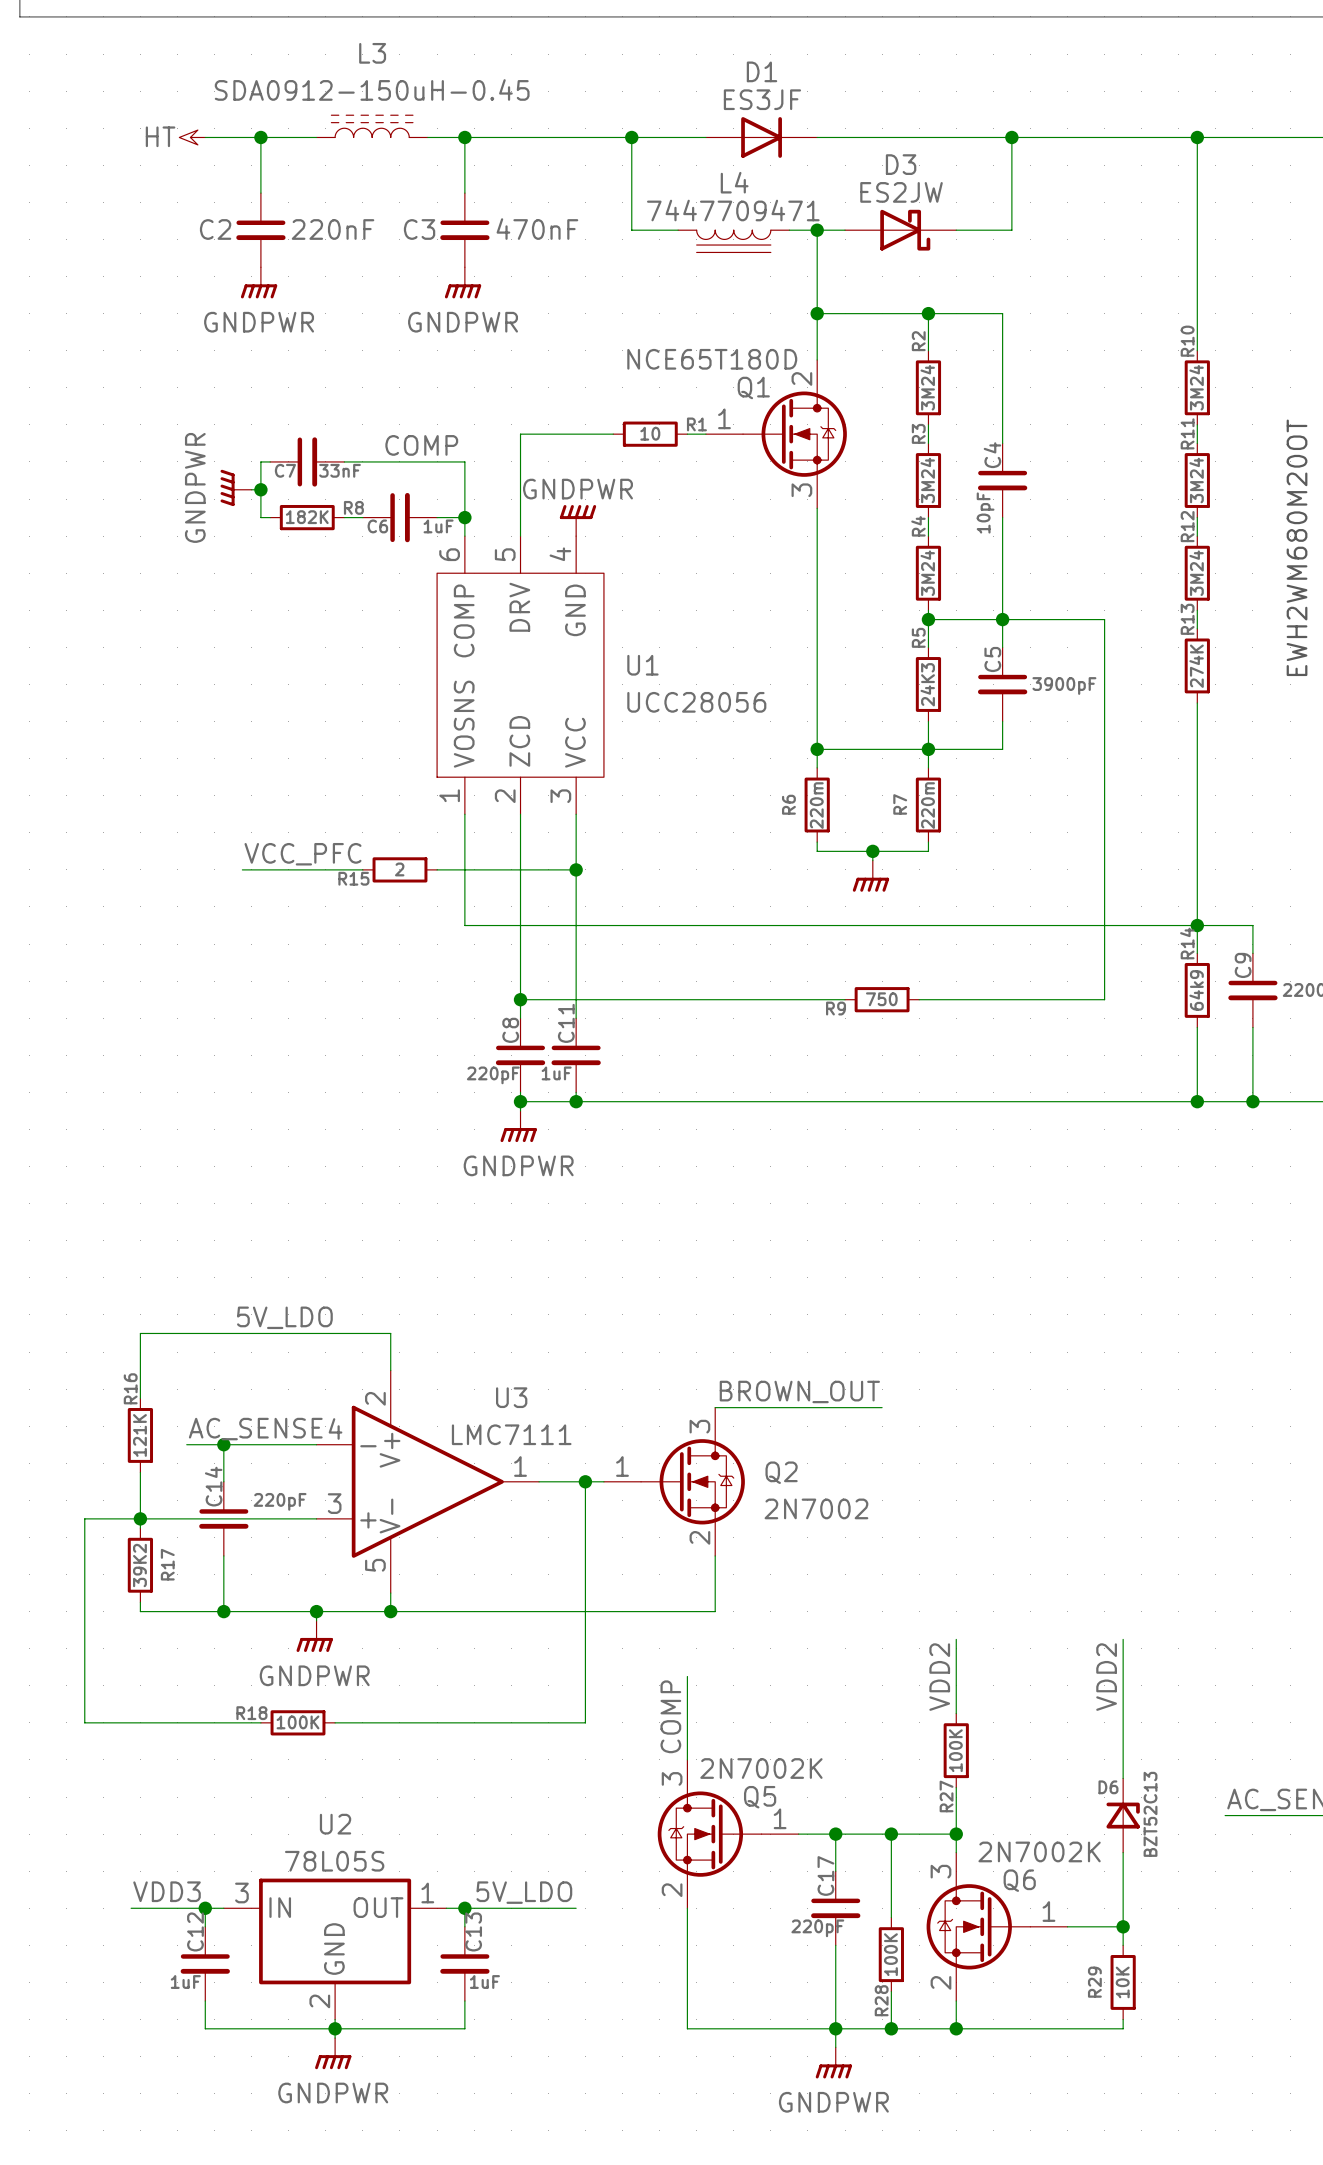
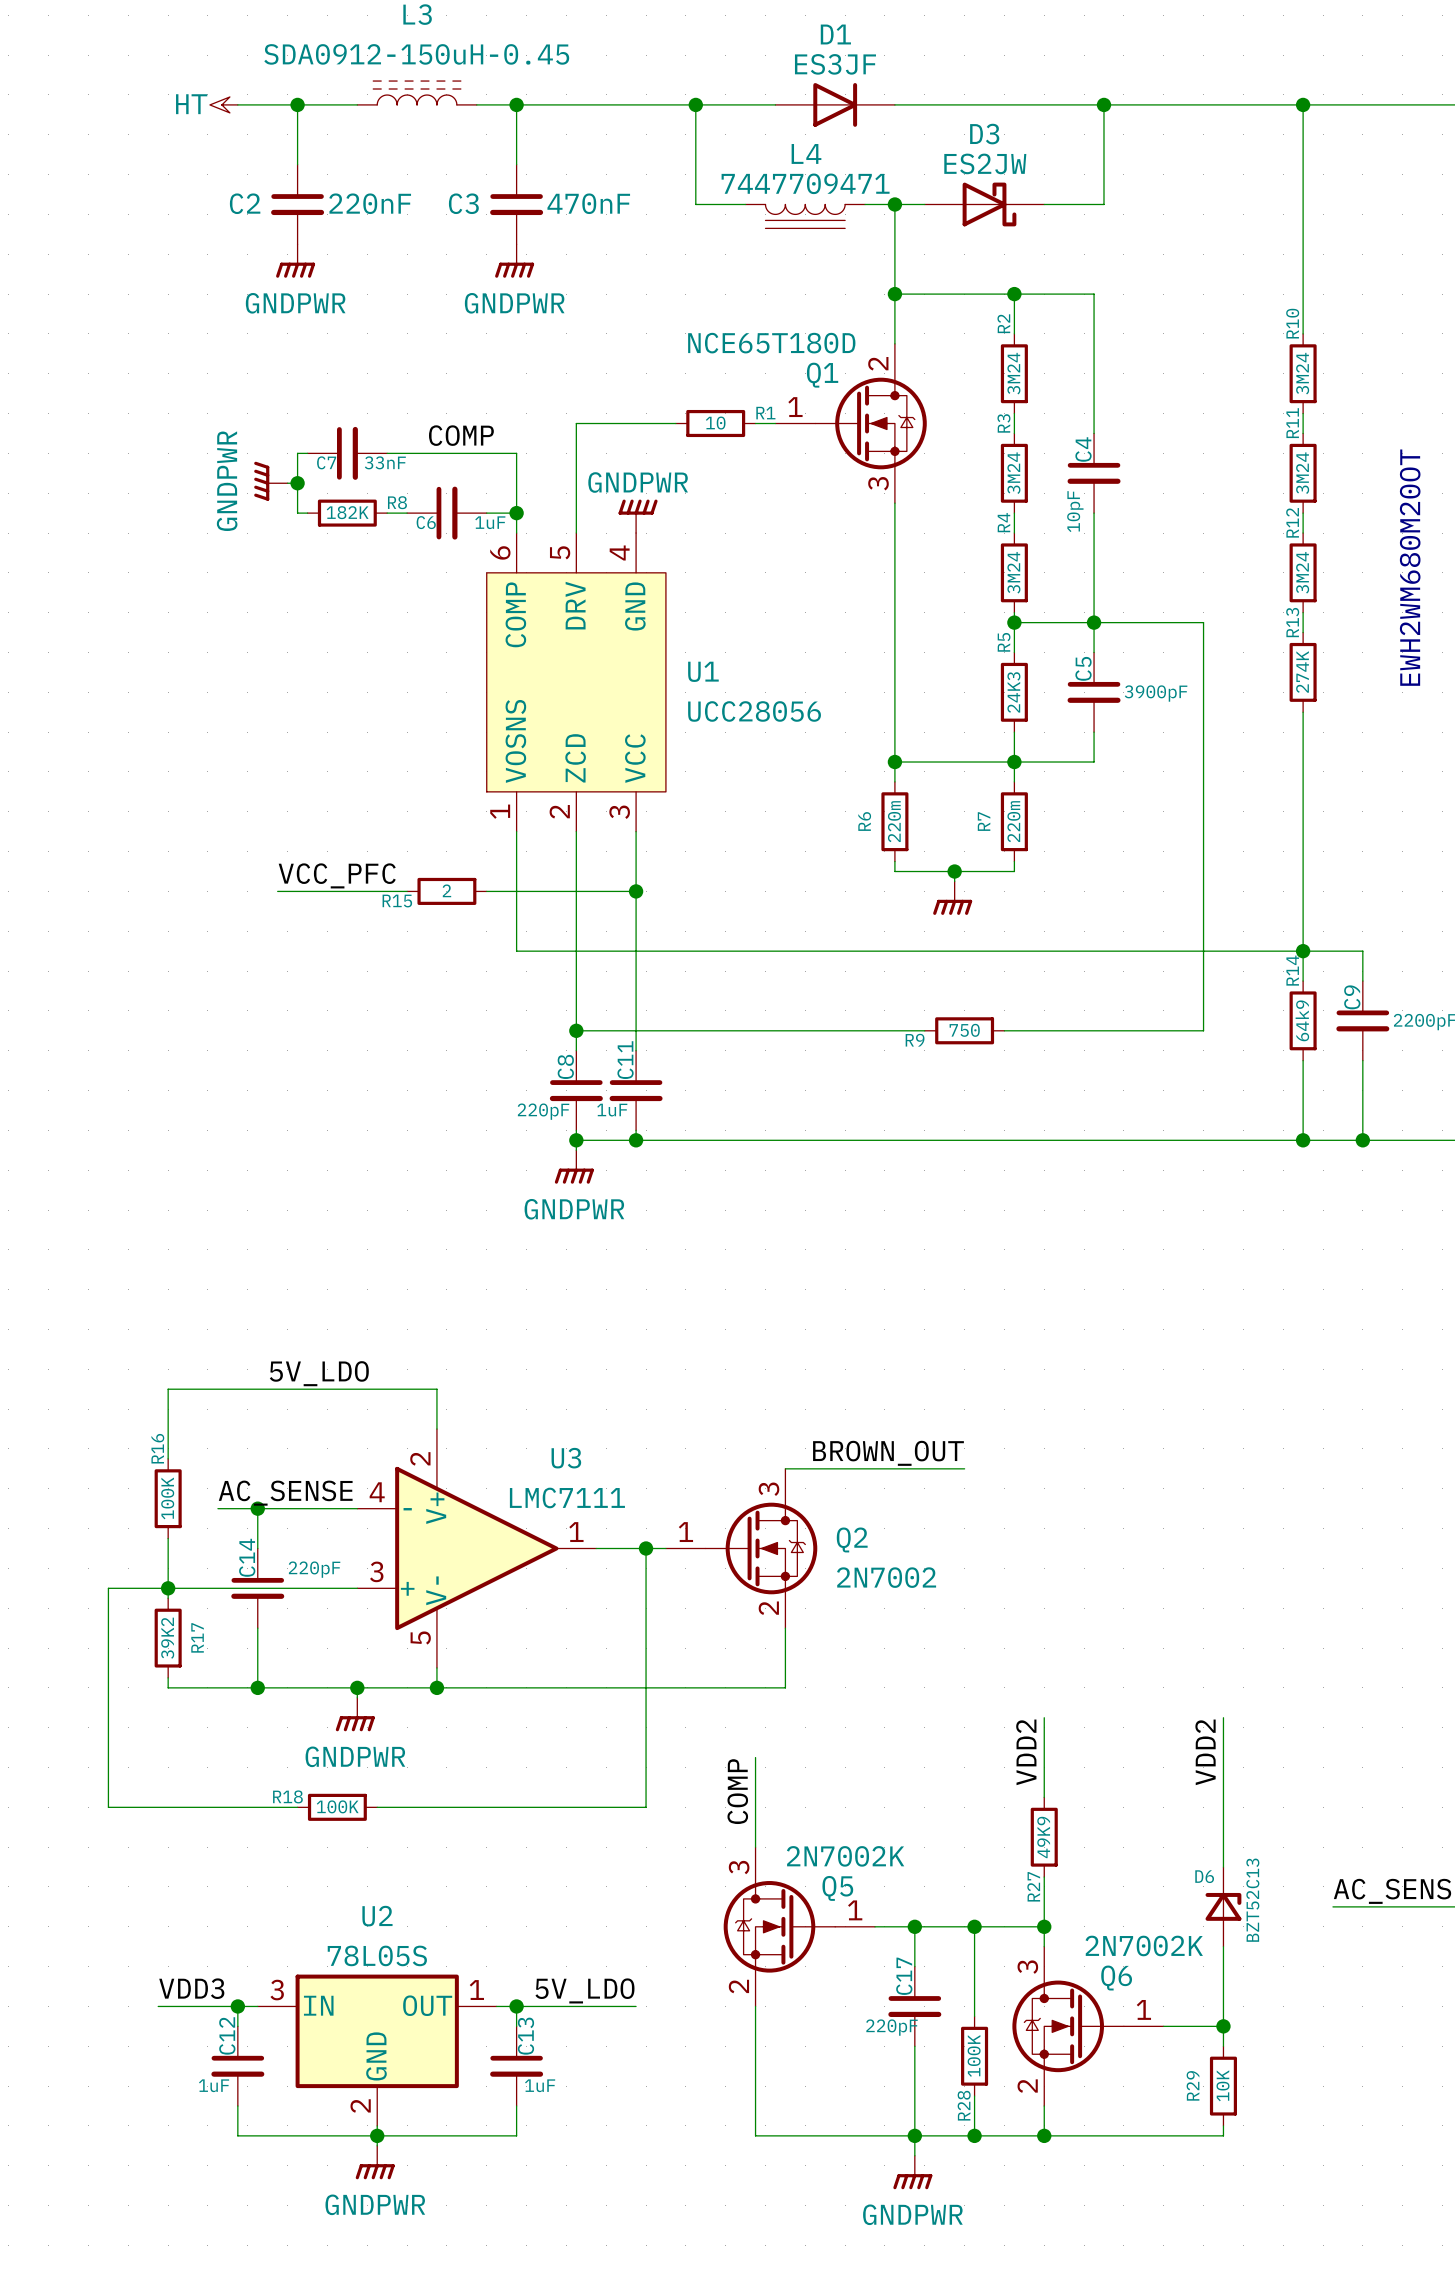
R16 value: 121K (139, 1435) -> 100K (167, 1498)
R27 value: 100K (955, 1750) -> 49K9 (1043, 1837)

